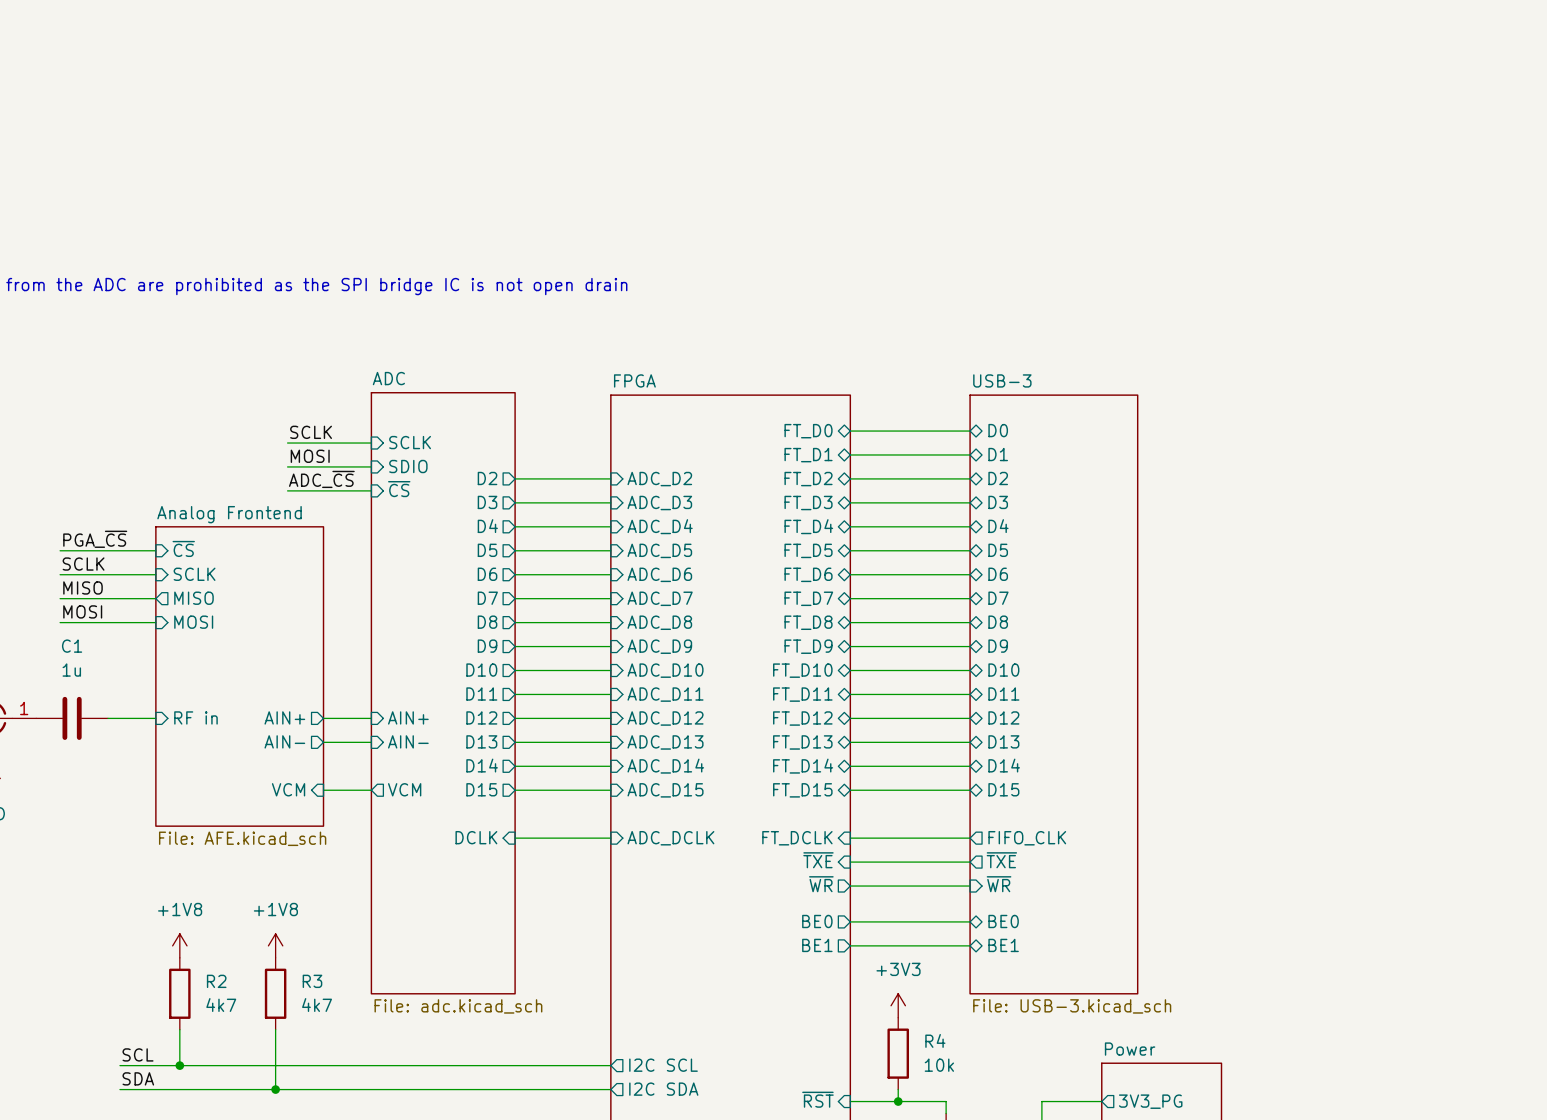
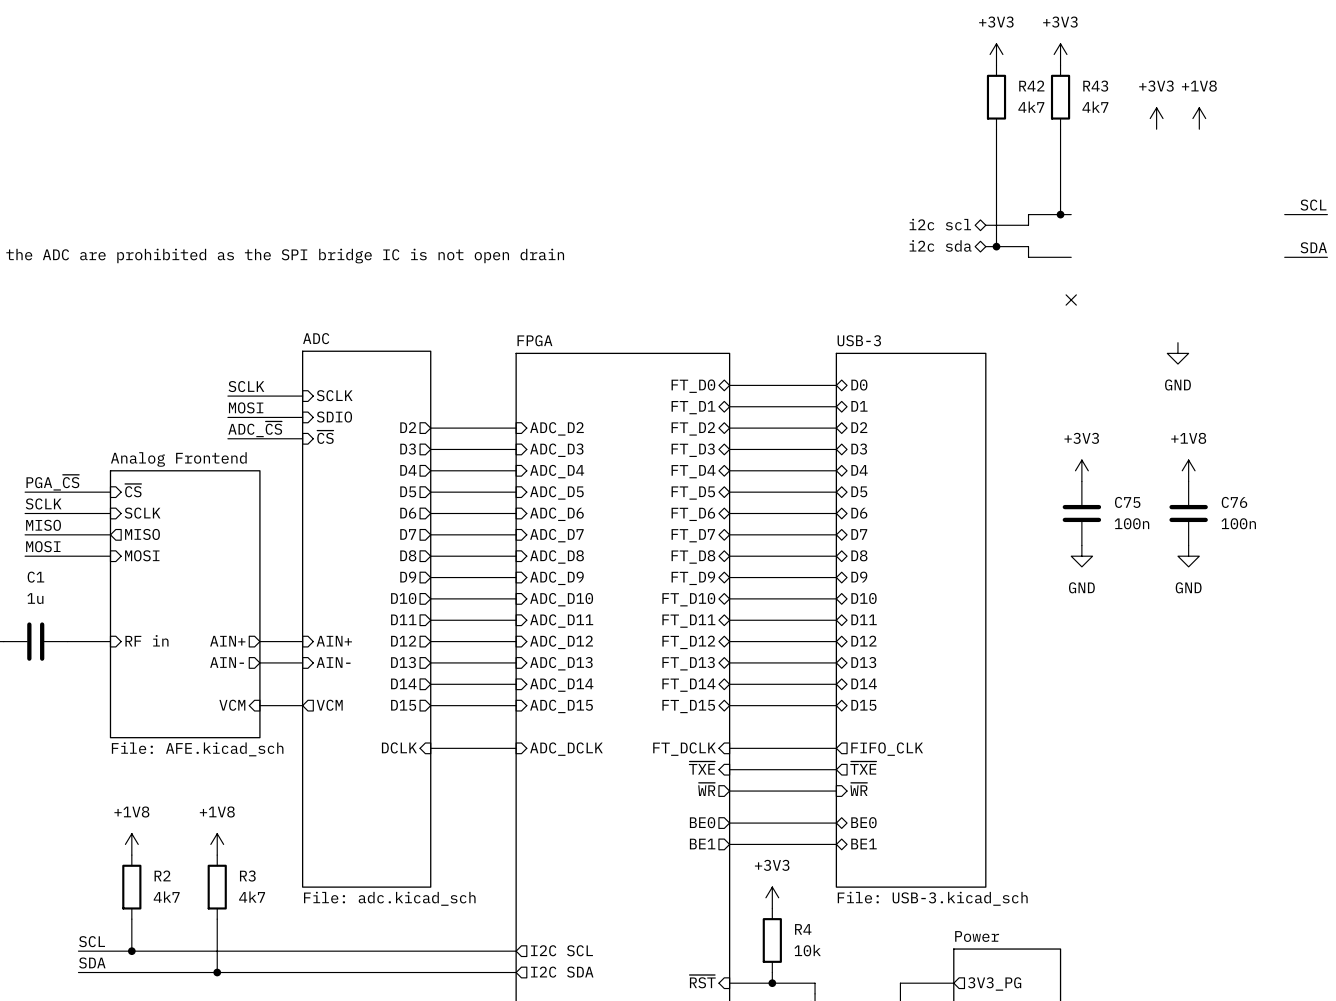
power symbol: none -> +3V3 (996, 54)
power symbol: none -> +3V3 (1060, 54)
R42: none -> 4k7 (996, 97)
R43: none -> 4k7 (1060, 97)
power symbol: none -> +3V3 (1156, 118)
power symbol: none -> +1V8 (1199, 118)
wire: none -> (996, 129) (996, 246)
wire: none -> (1060, 129) (1060, 214)
label: none -> SCL (1313, 205)
junction: none -> (1060, 214)
wire: none -> (1071, 214) (1028, 214) (1028, 225) (985, 225)
wire: none -> (1284, 214) (1327, 214)
sheet pin: none -> i2c scl (940, 224)
sheet pin: none -> i2c sda (940, 245)
wire: none -> (985, 246) (1028, 246) (1028, 257) (1071, 257)
junction: none -> (996, 246)
label: none -> SDA (1313, 247)
wire: none -> (1284, 257) (1327, 257)
no-connect mark: none -> (1071, 300)
power symbol: none -> GND (1177, 353)
power symbol: none -> +3V3 (1081, 470)
power symbol: none -> +1V8 (1188, 470)
C75: none -> 100n (1081, 513)
C76: none -> 100n (1188, 513)
power symbol: none -> GND (1081, 556)
power symbol: none -> GND (1188, 556)

